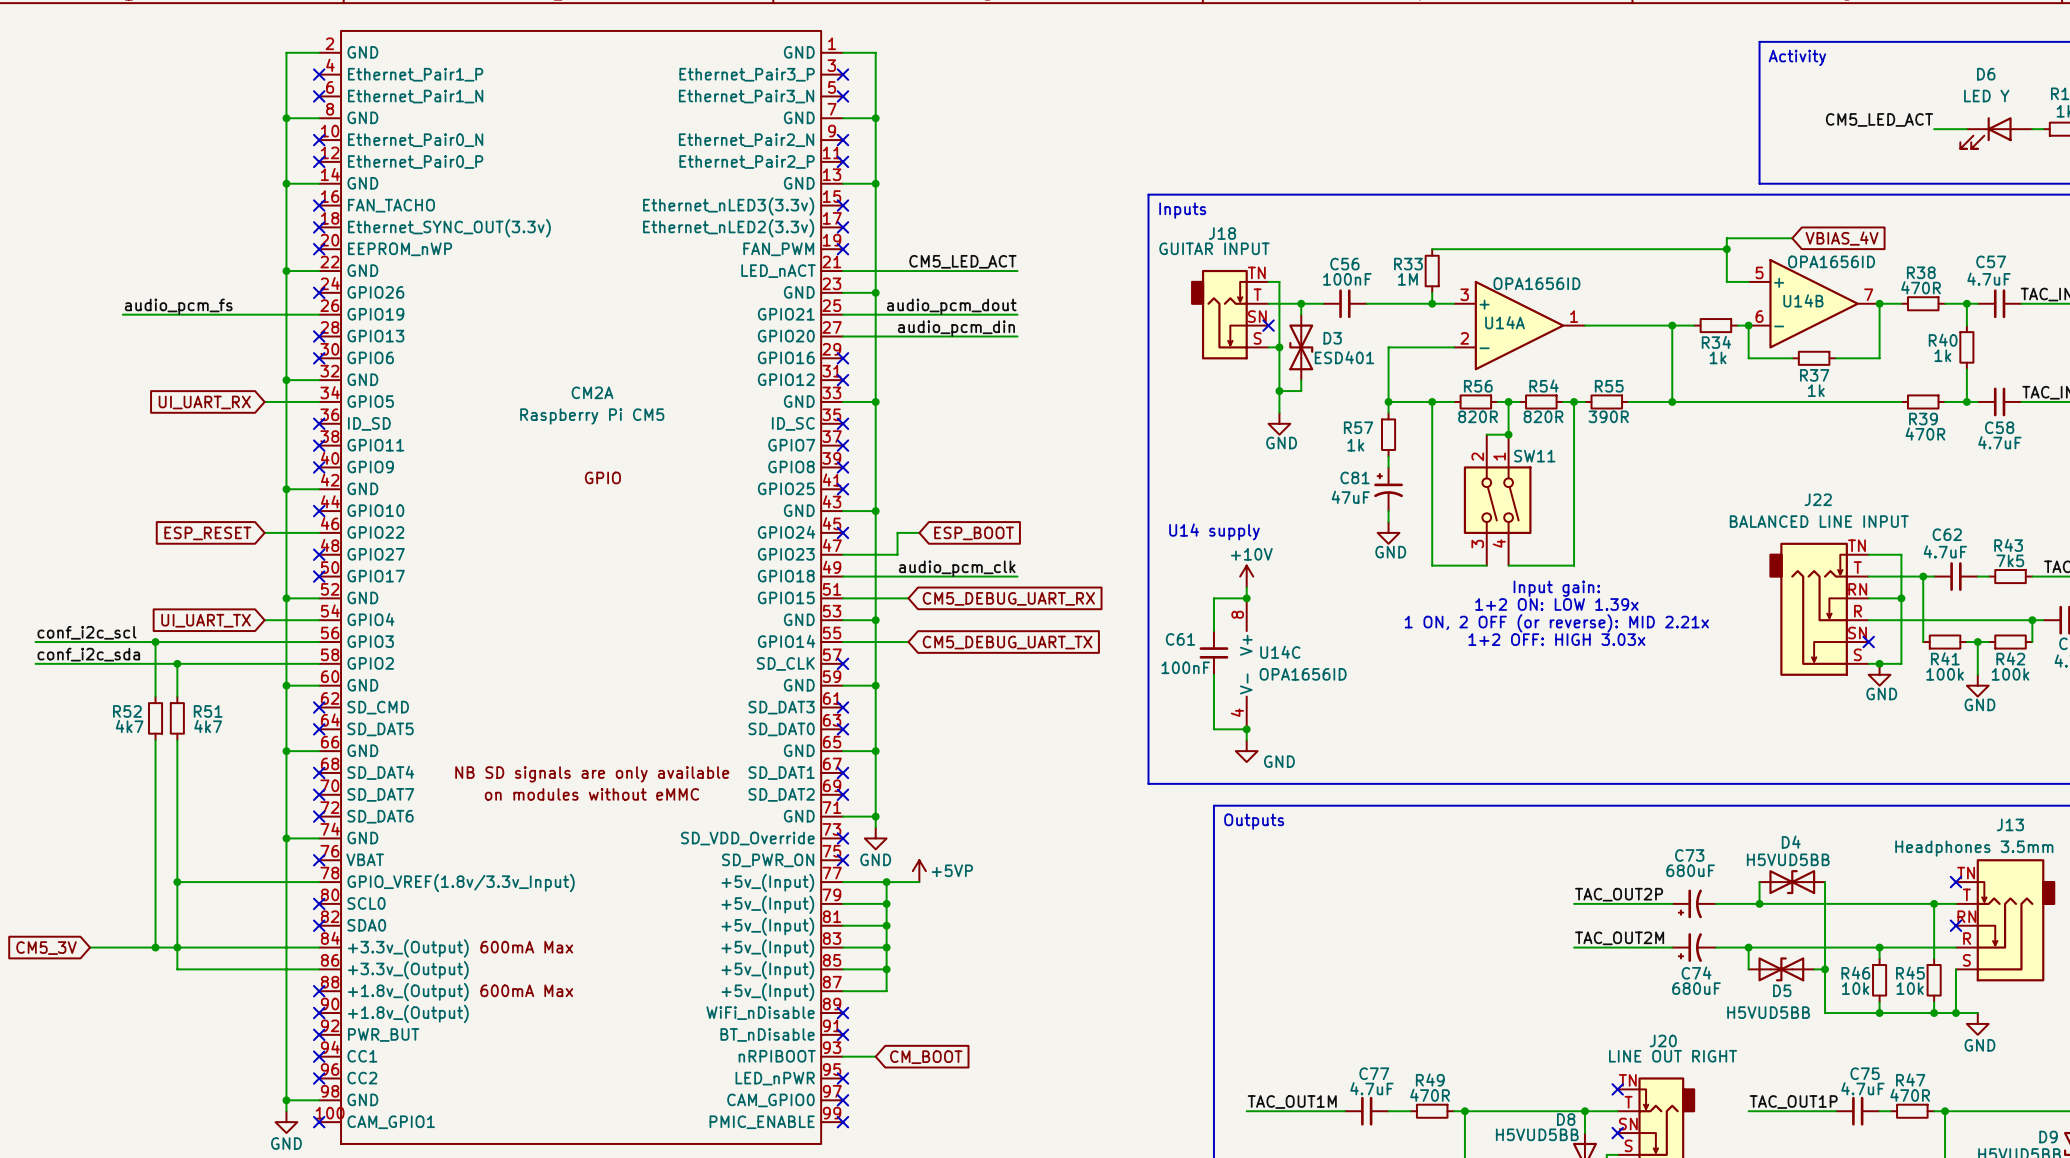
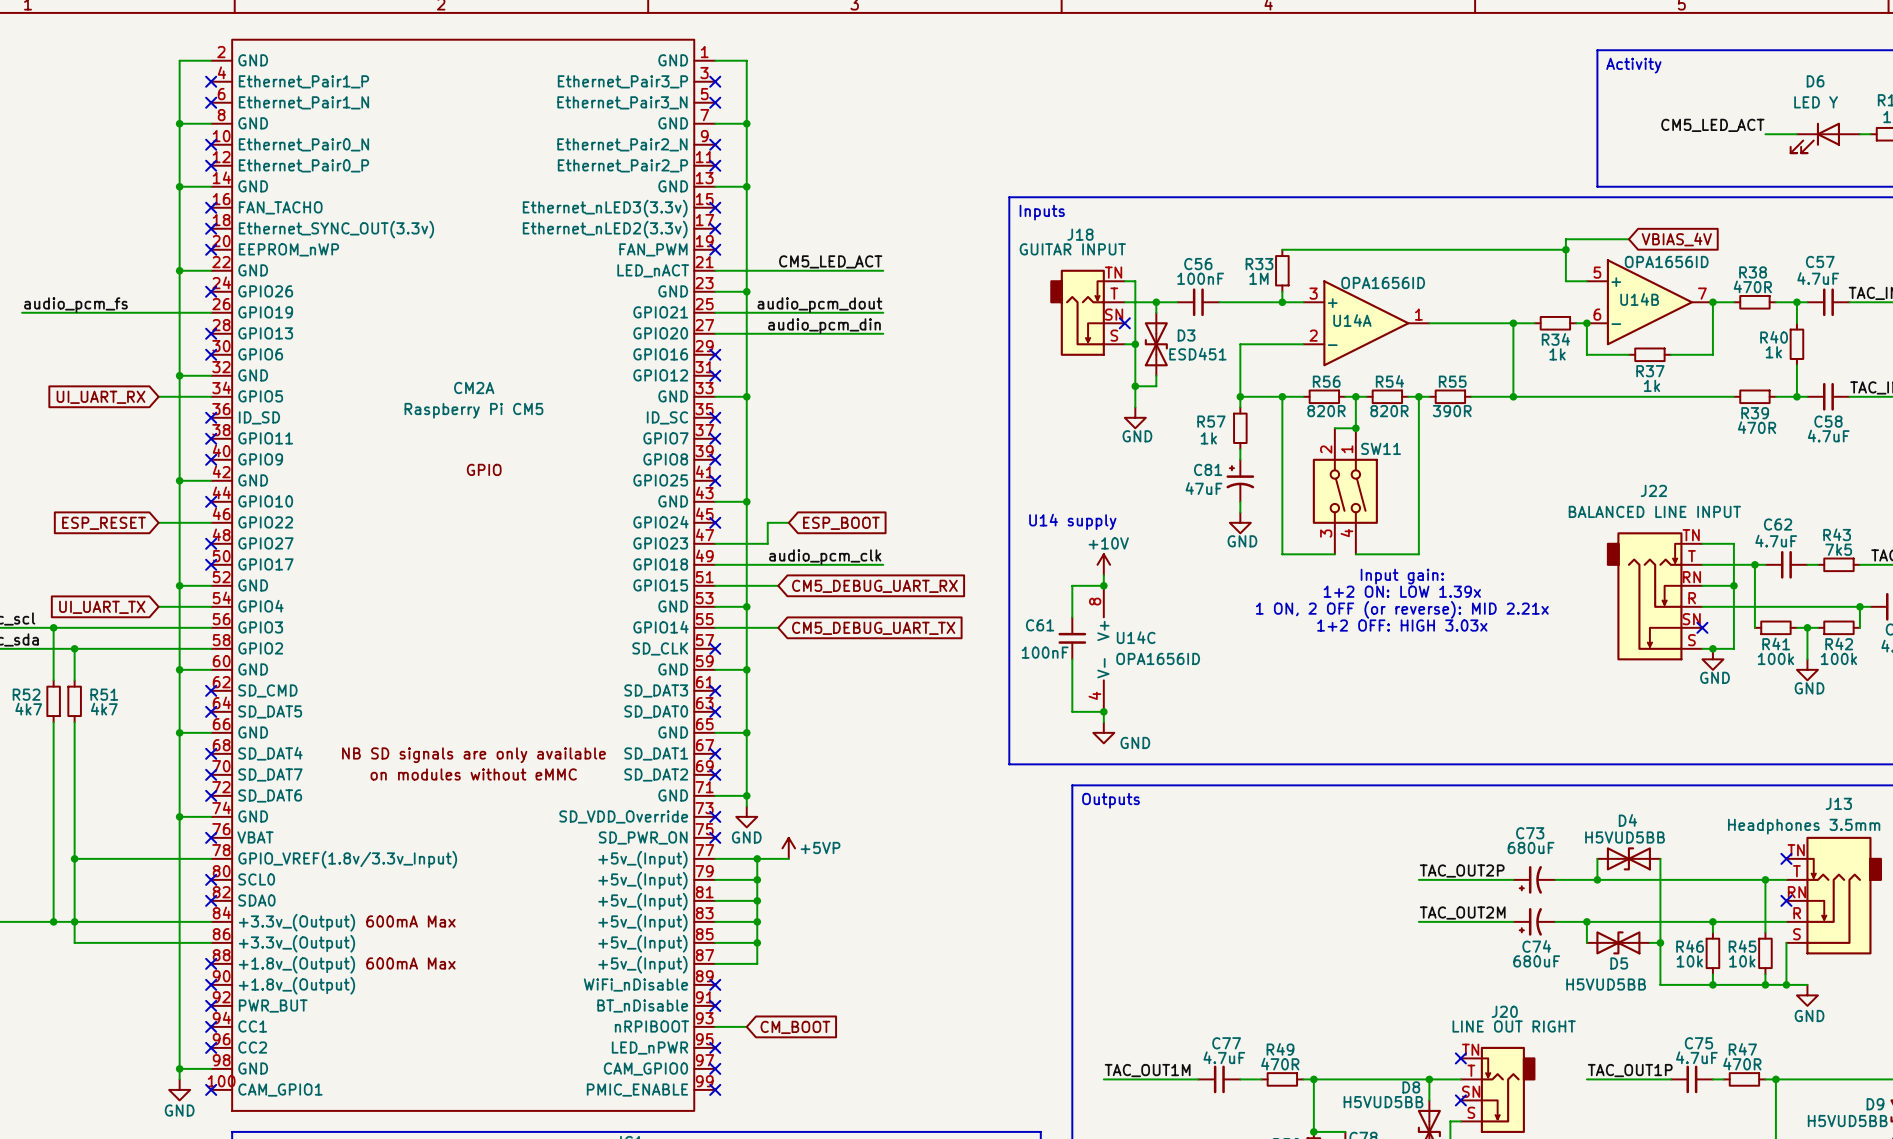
D3 value: ESD401 (1344, 357) -> ESD451 (1197, 354)

